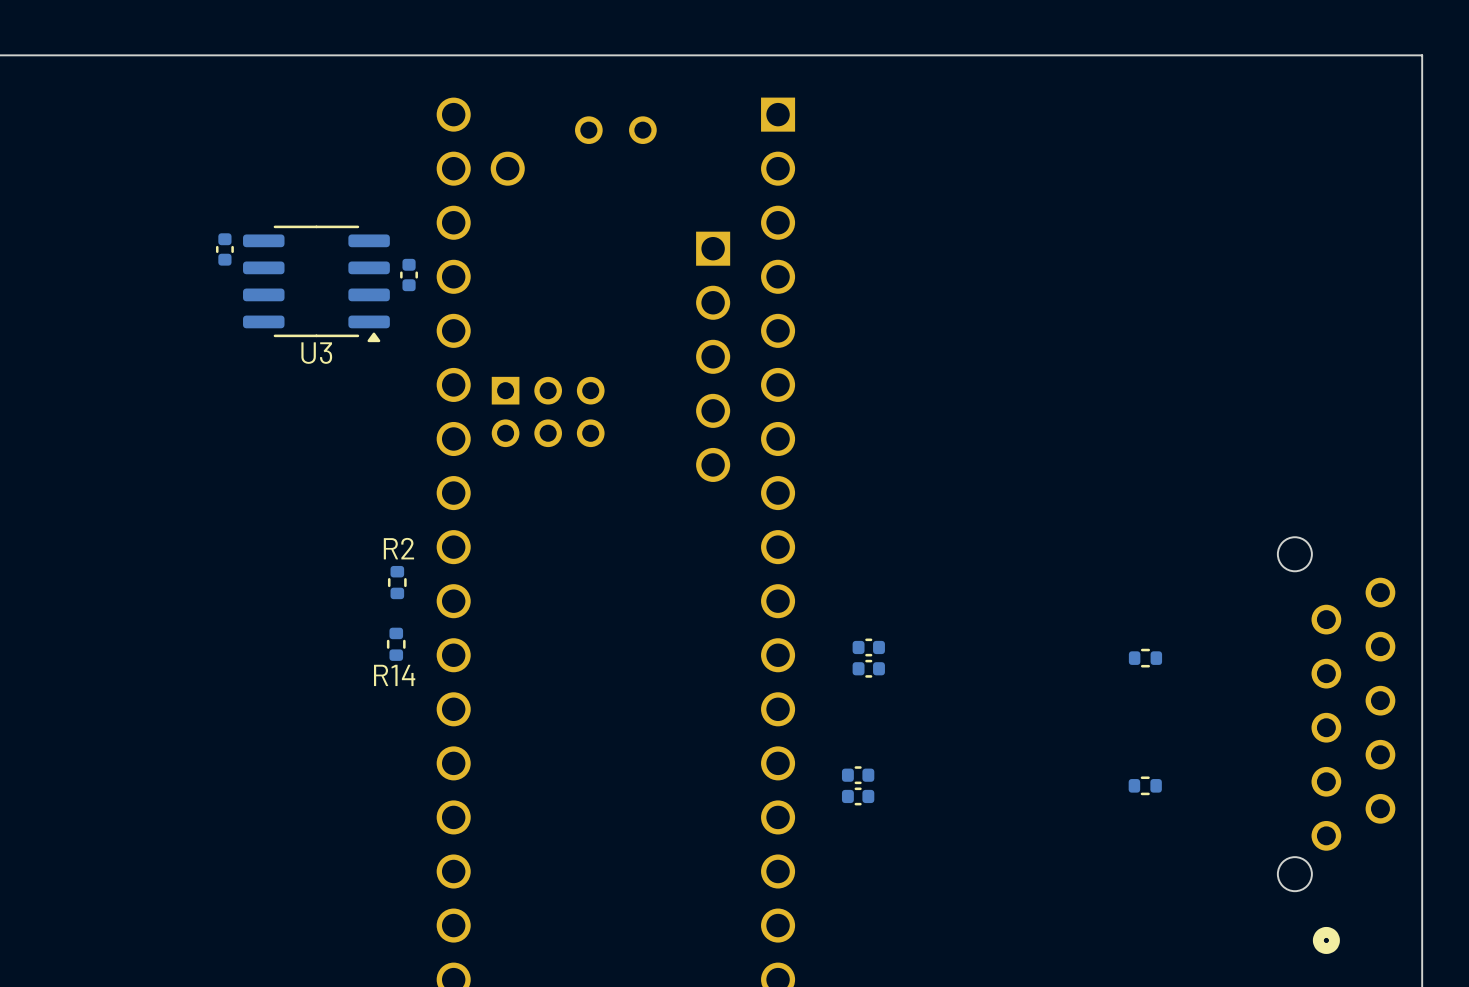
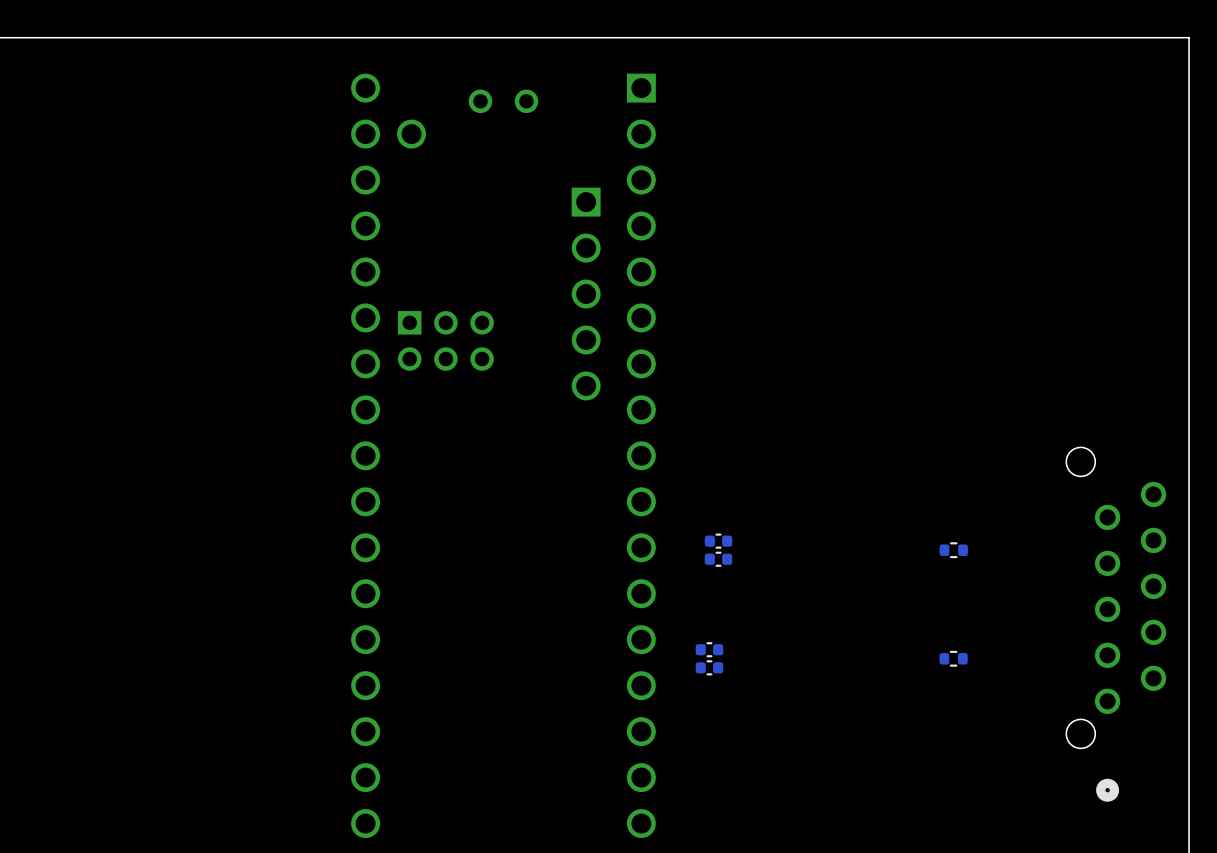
part: (224, 249) -> none
part: (409, 275) -> none
U3: (316, 283) -> none
R2: (397, 582) -> none
R14: (396, 644) -> none

